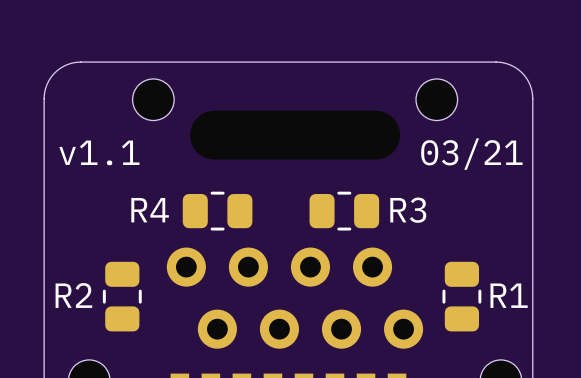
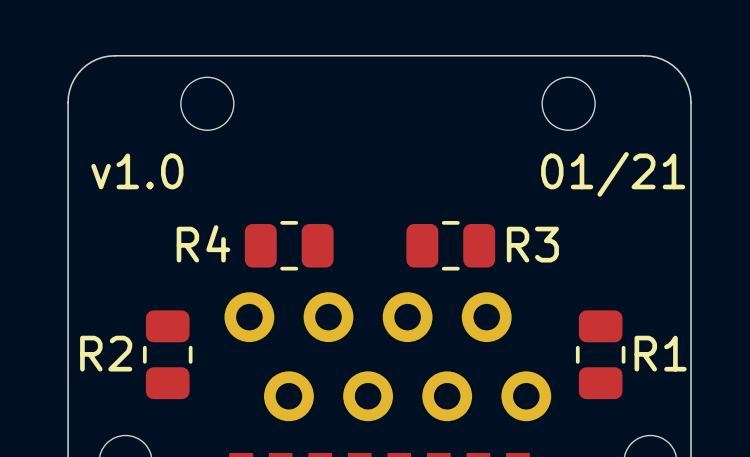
text: v1.1 (99, 152) -> v1.0 (137, 171)
text: 03/21 (471, 154) -> 01/21 (613, 174)

